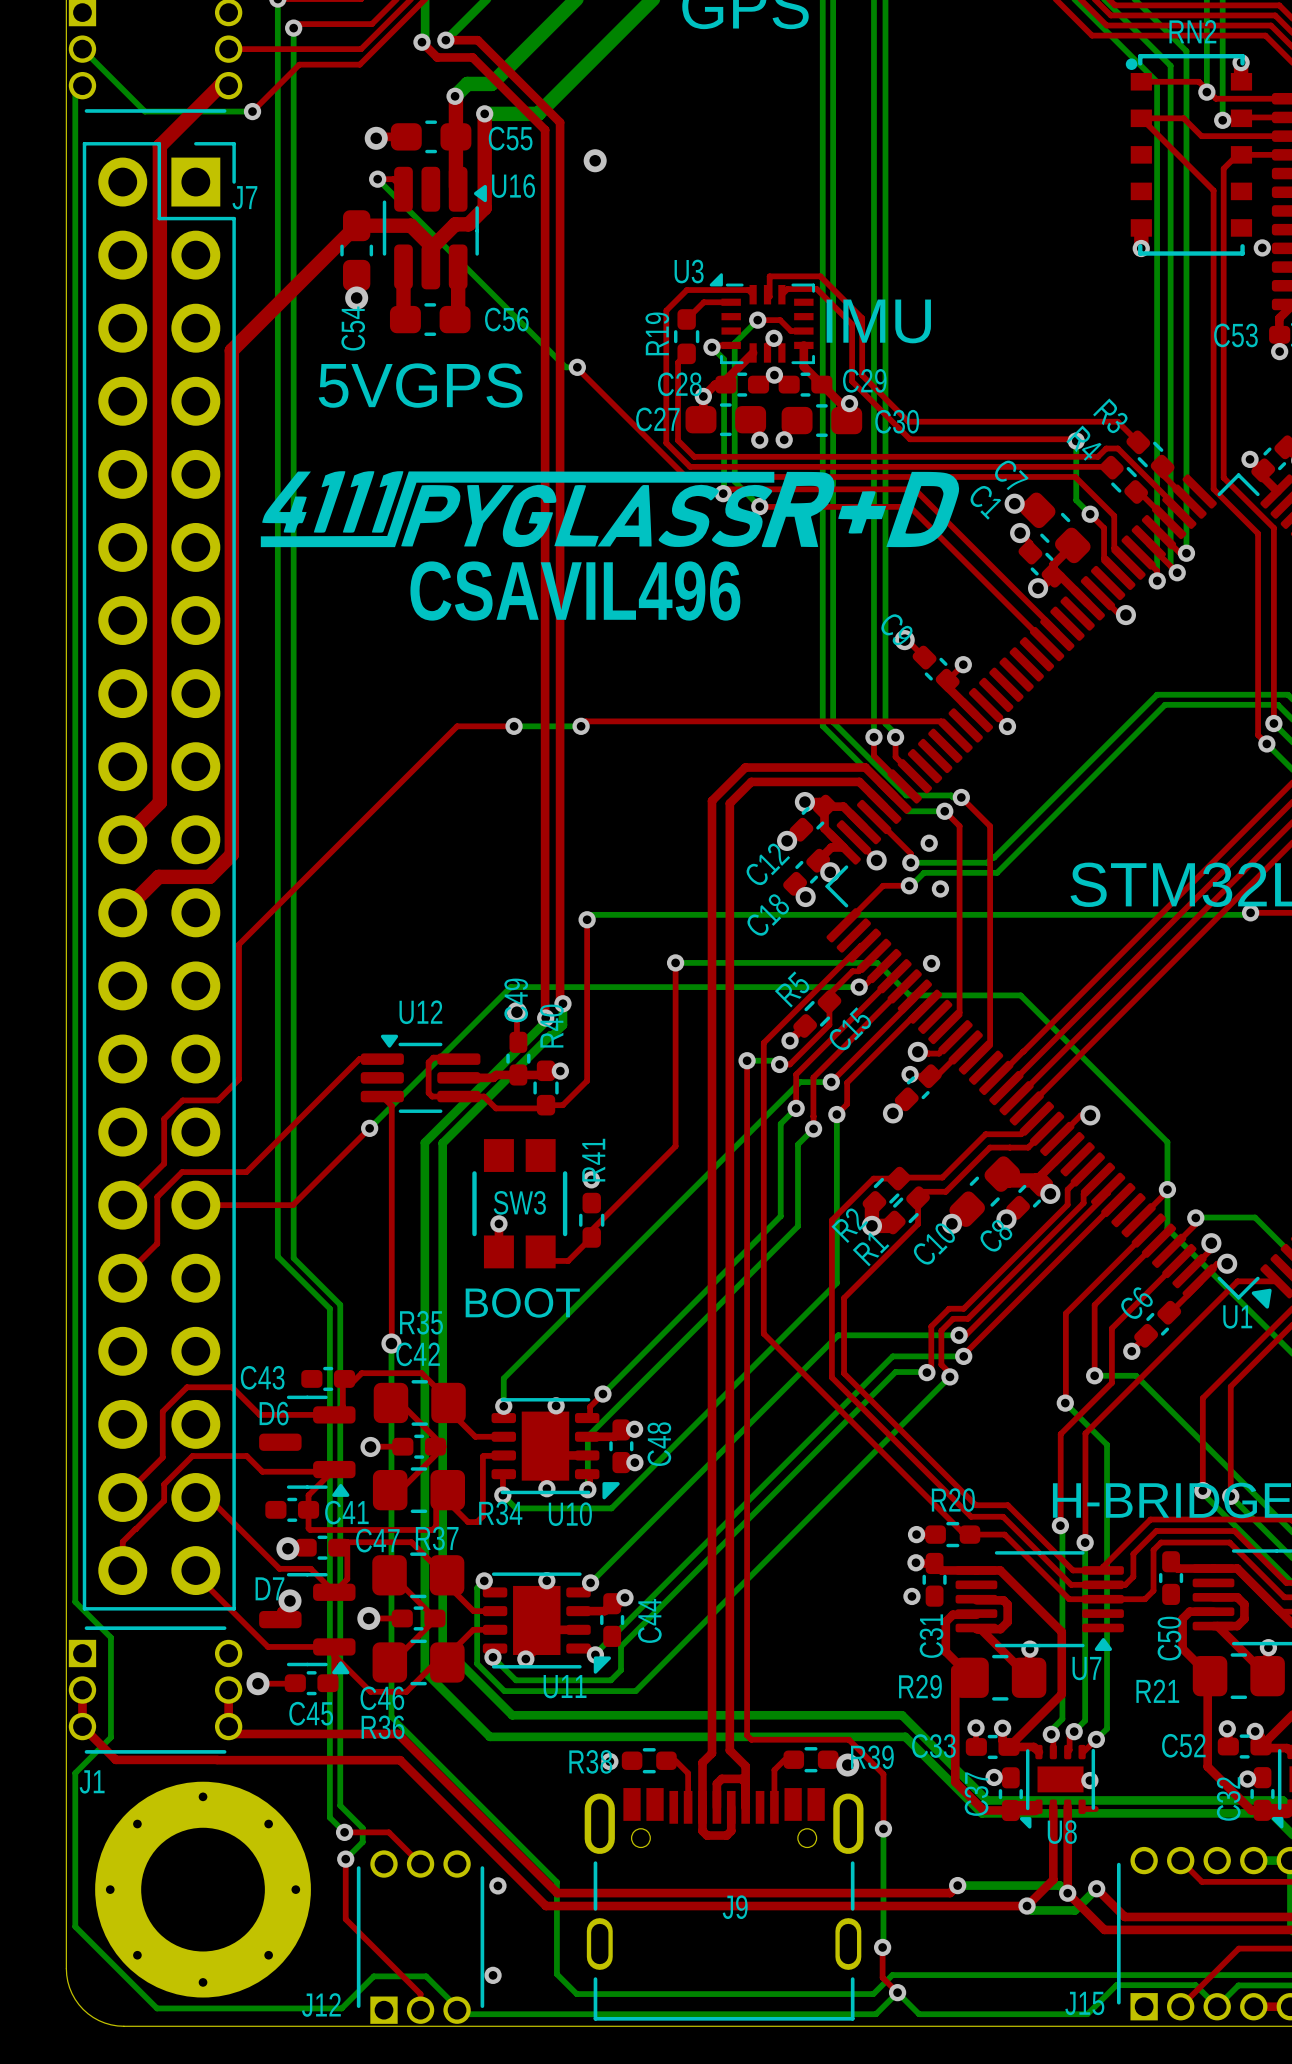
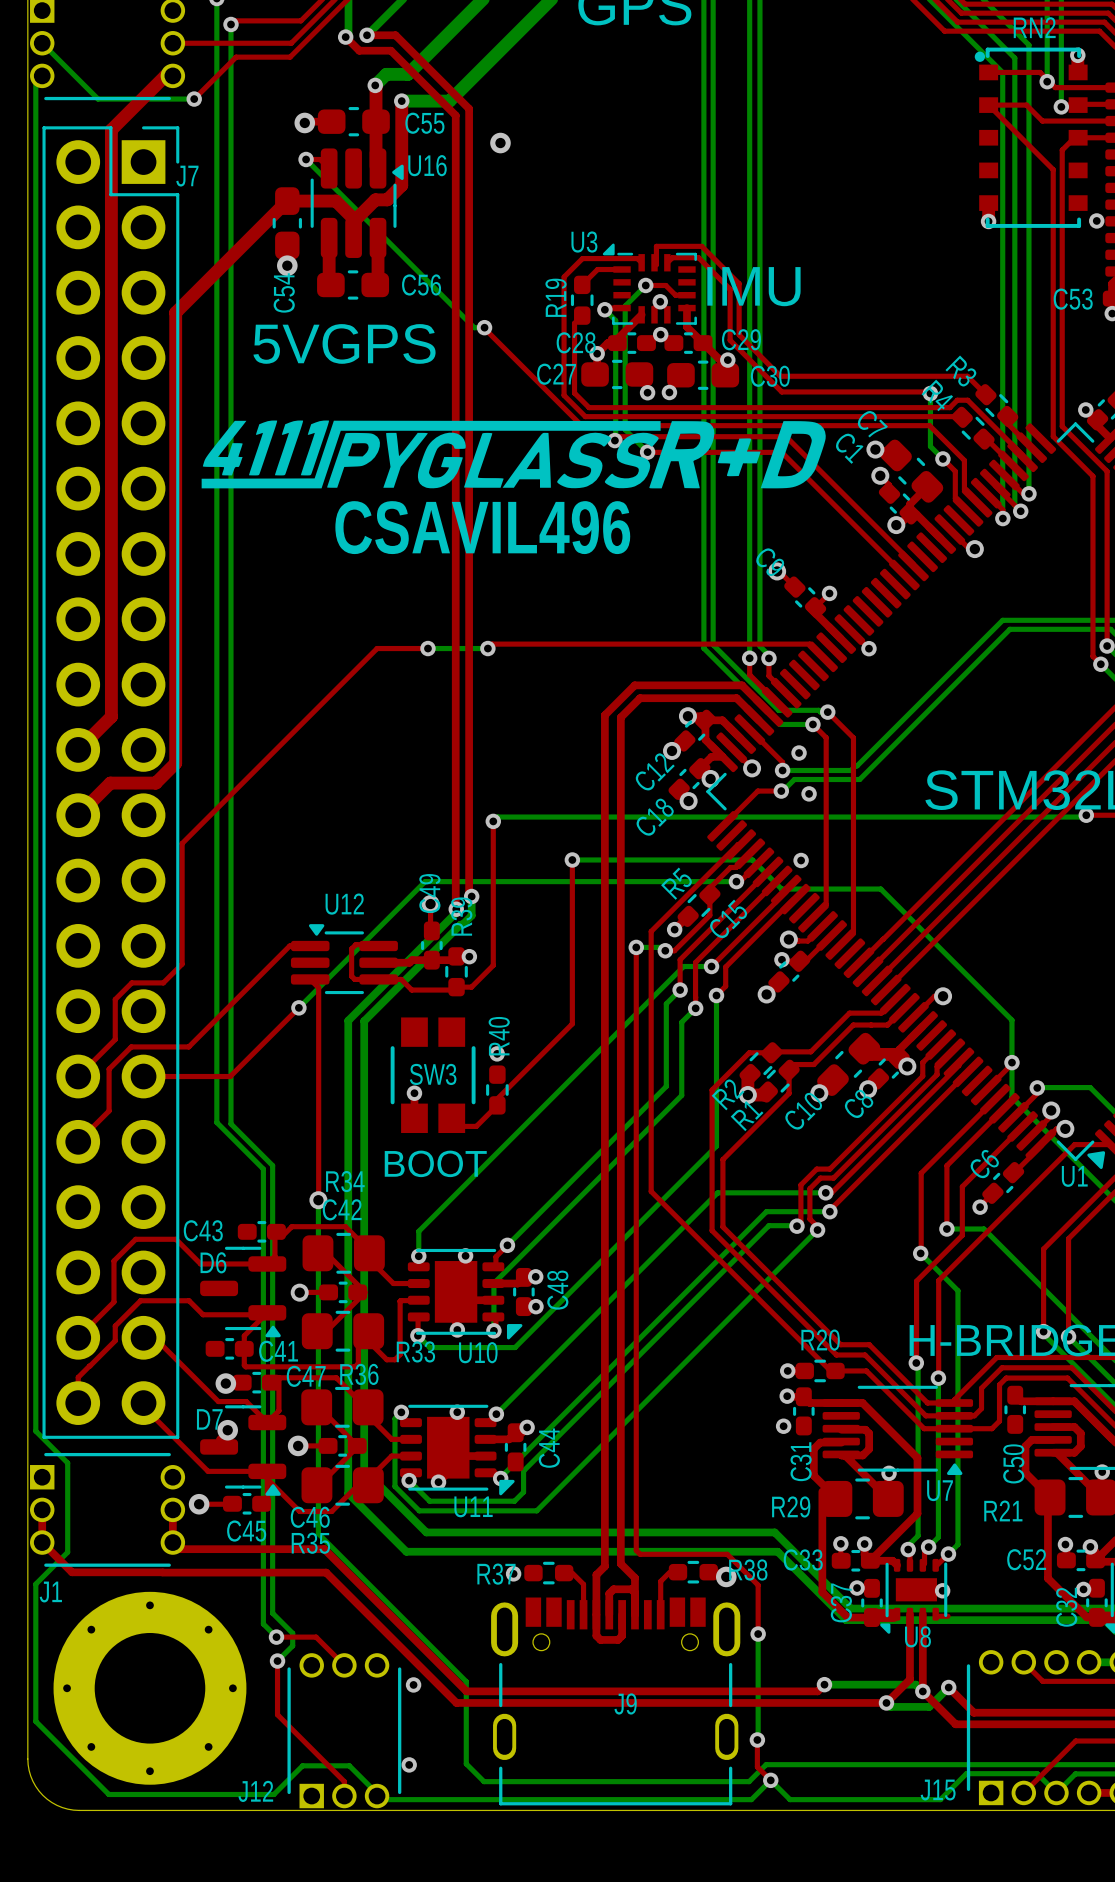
R40 name: R40 (551, 1026) -> R39 (461, 916)
R41 name: R41 (593, 1160) -> R40 (499, 1036)
R35 name: R35 (421, 1322) -> R34 (345, 1181)
R34 name: R34 (500, 1513) -> R33 (415, 1351)
R37 name: R37 (437, 1538) -> R36 (359, 1374)
R36 name: R36 (383, 1727) -> R35 (310, 1543)
R39 name: R39 (872, 1757) -> R38 (748, 1569)
R38 name: R38 (590, 1761) -> R37 (496, 1574)

